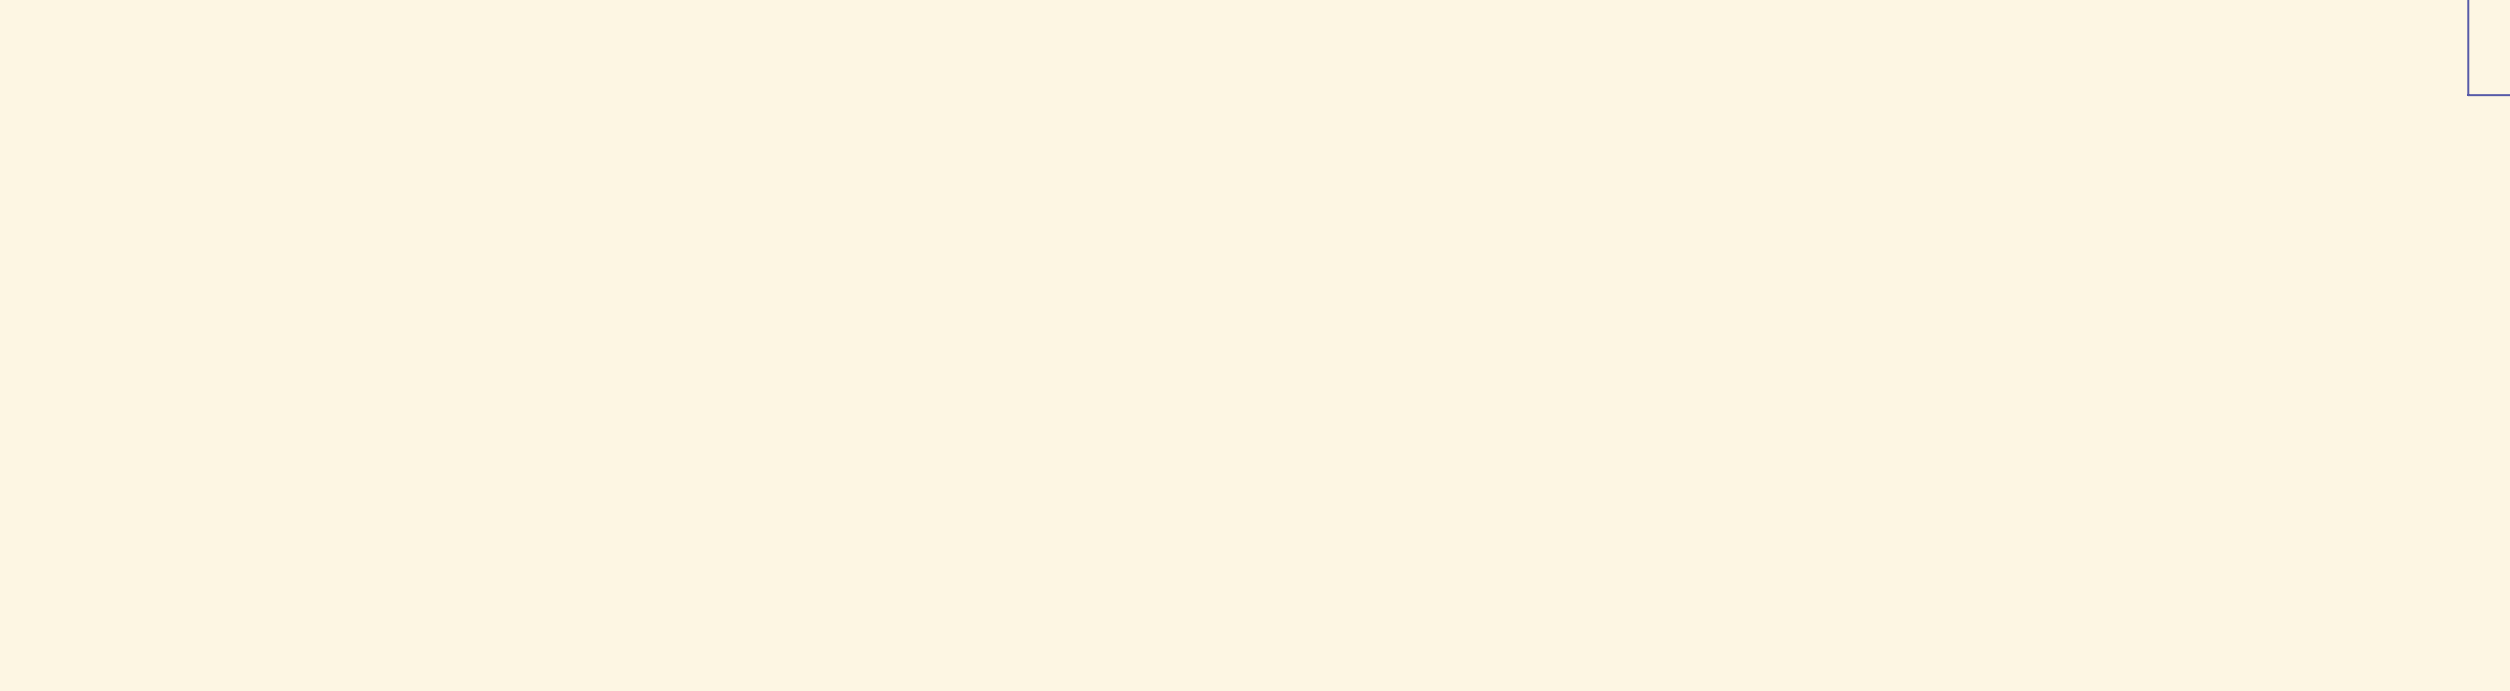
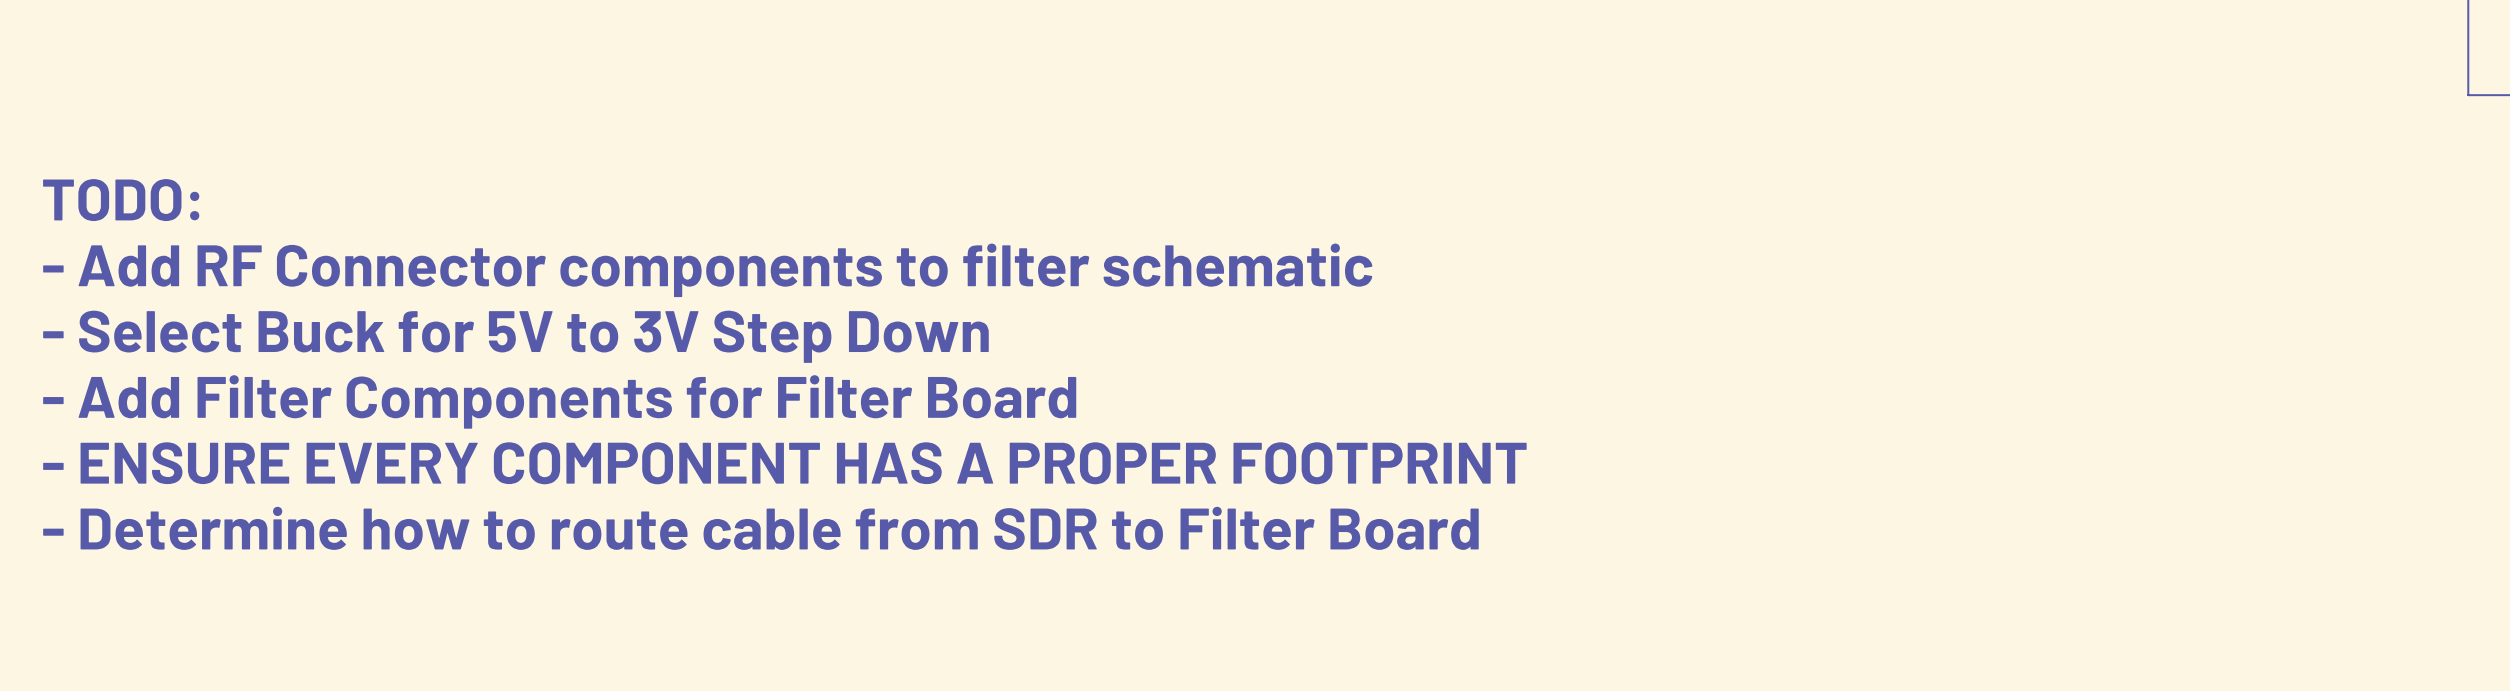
text: none -> TODO: (121, 200)
text: none -> - Add RF Connector components to filter schematic (707, 270)
text: none -> - Select Buck for 5V to 3V Step Down (515, 336)
text: none -> - Add Filter Components for Filter Board (559, 401)
text: none -> - ENSURE EVERY COMPONENT HAS A PROPER FOOTPRINT (784, 463)
text: none -> - Determine how to route cable from SDR to Filter Board (760, 528)

